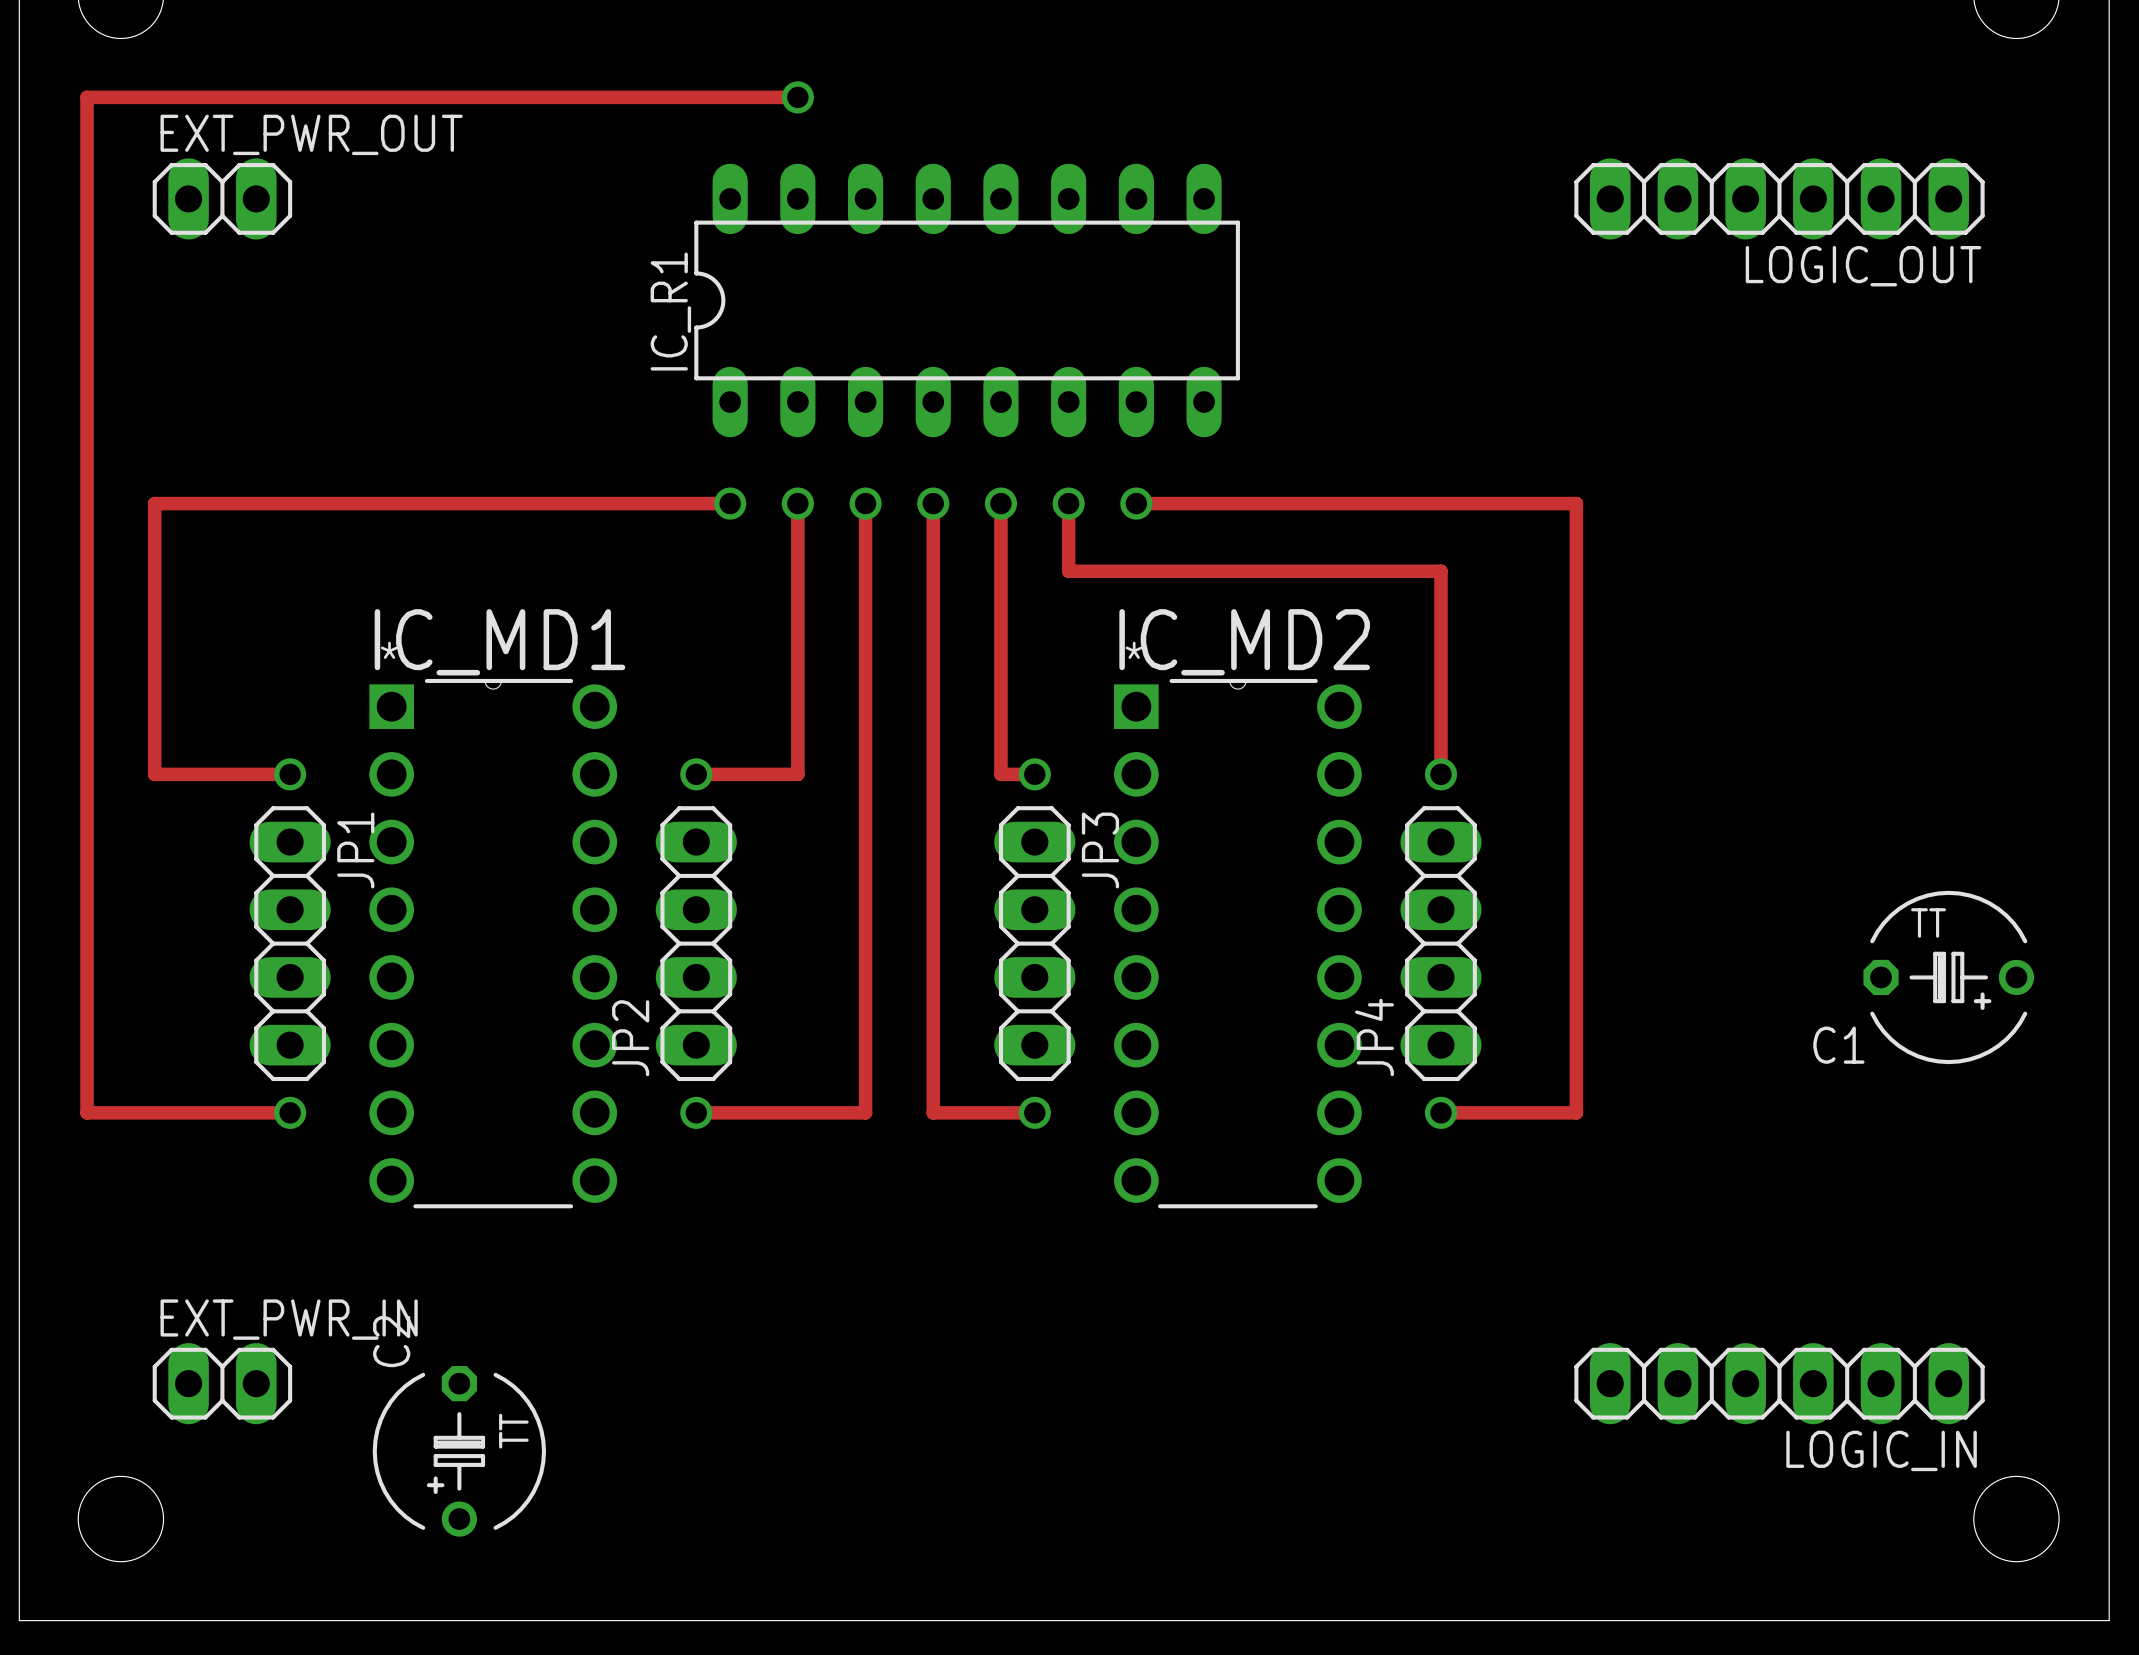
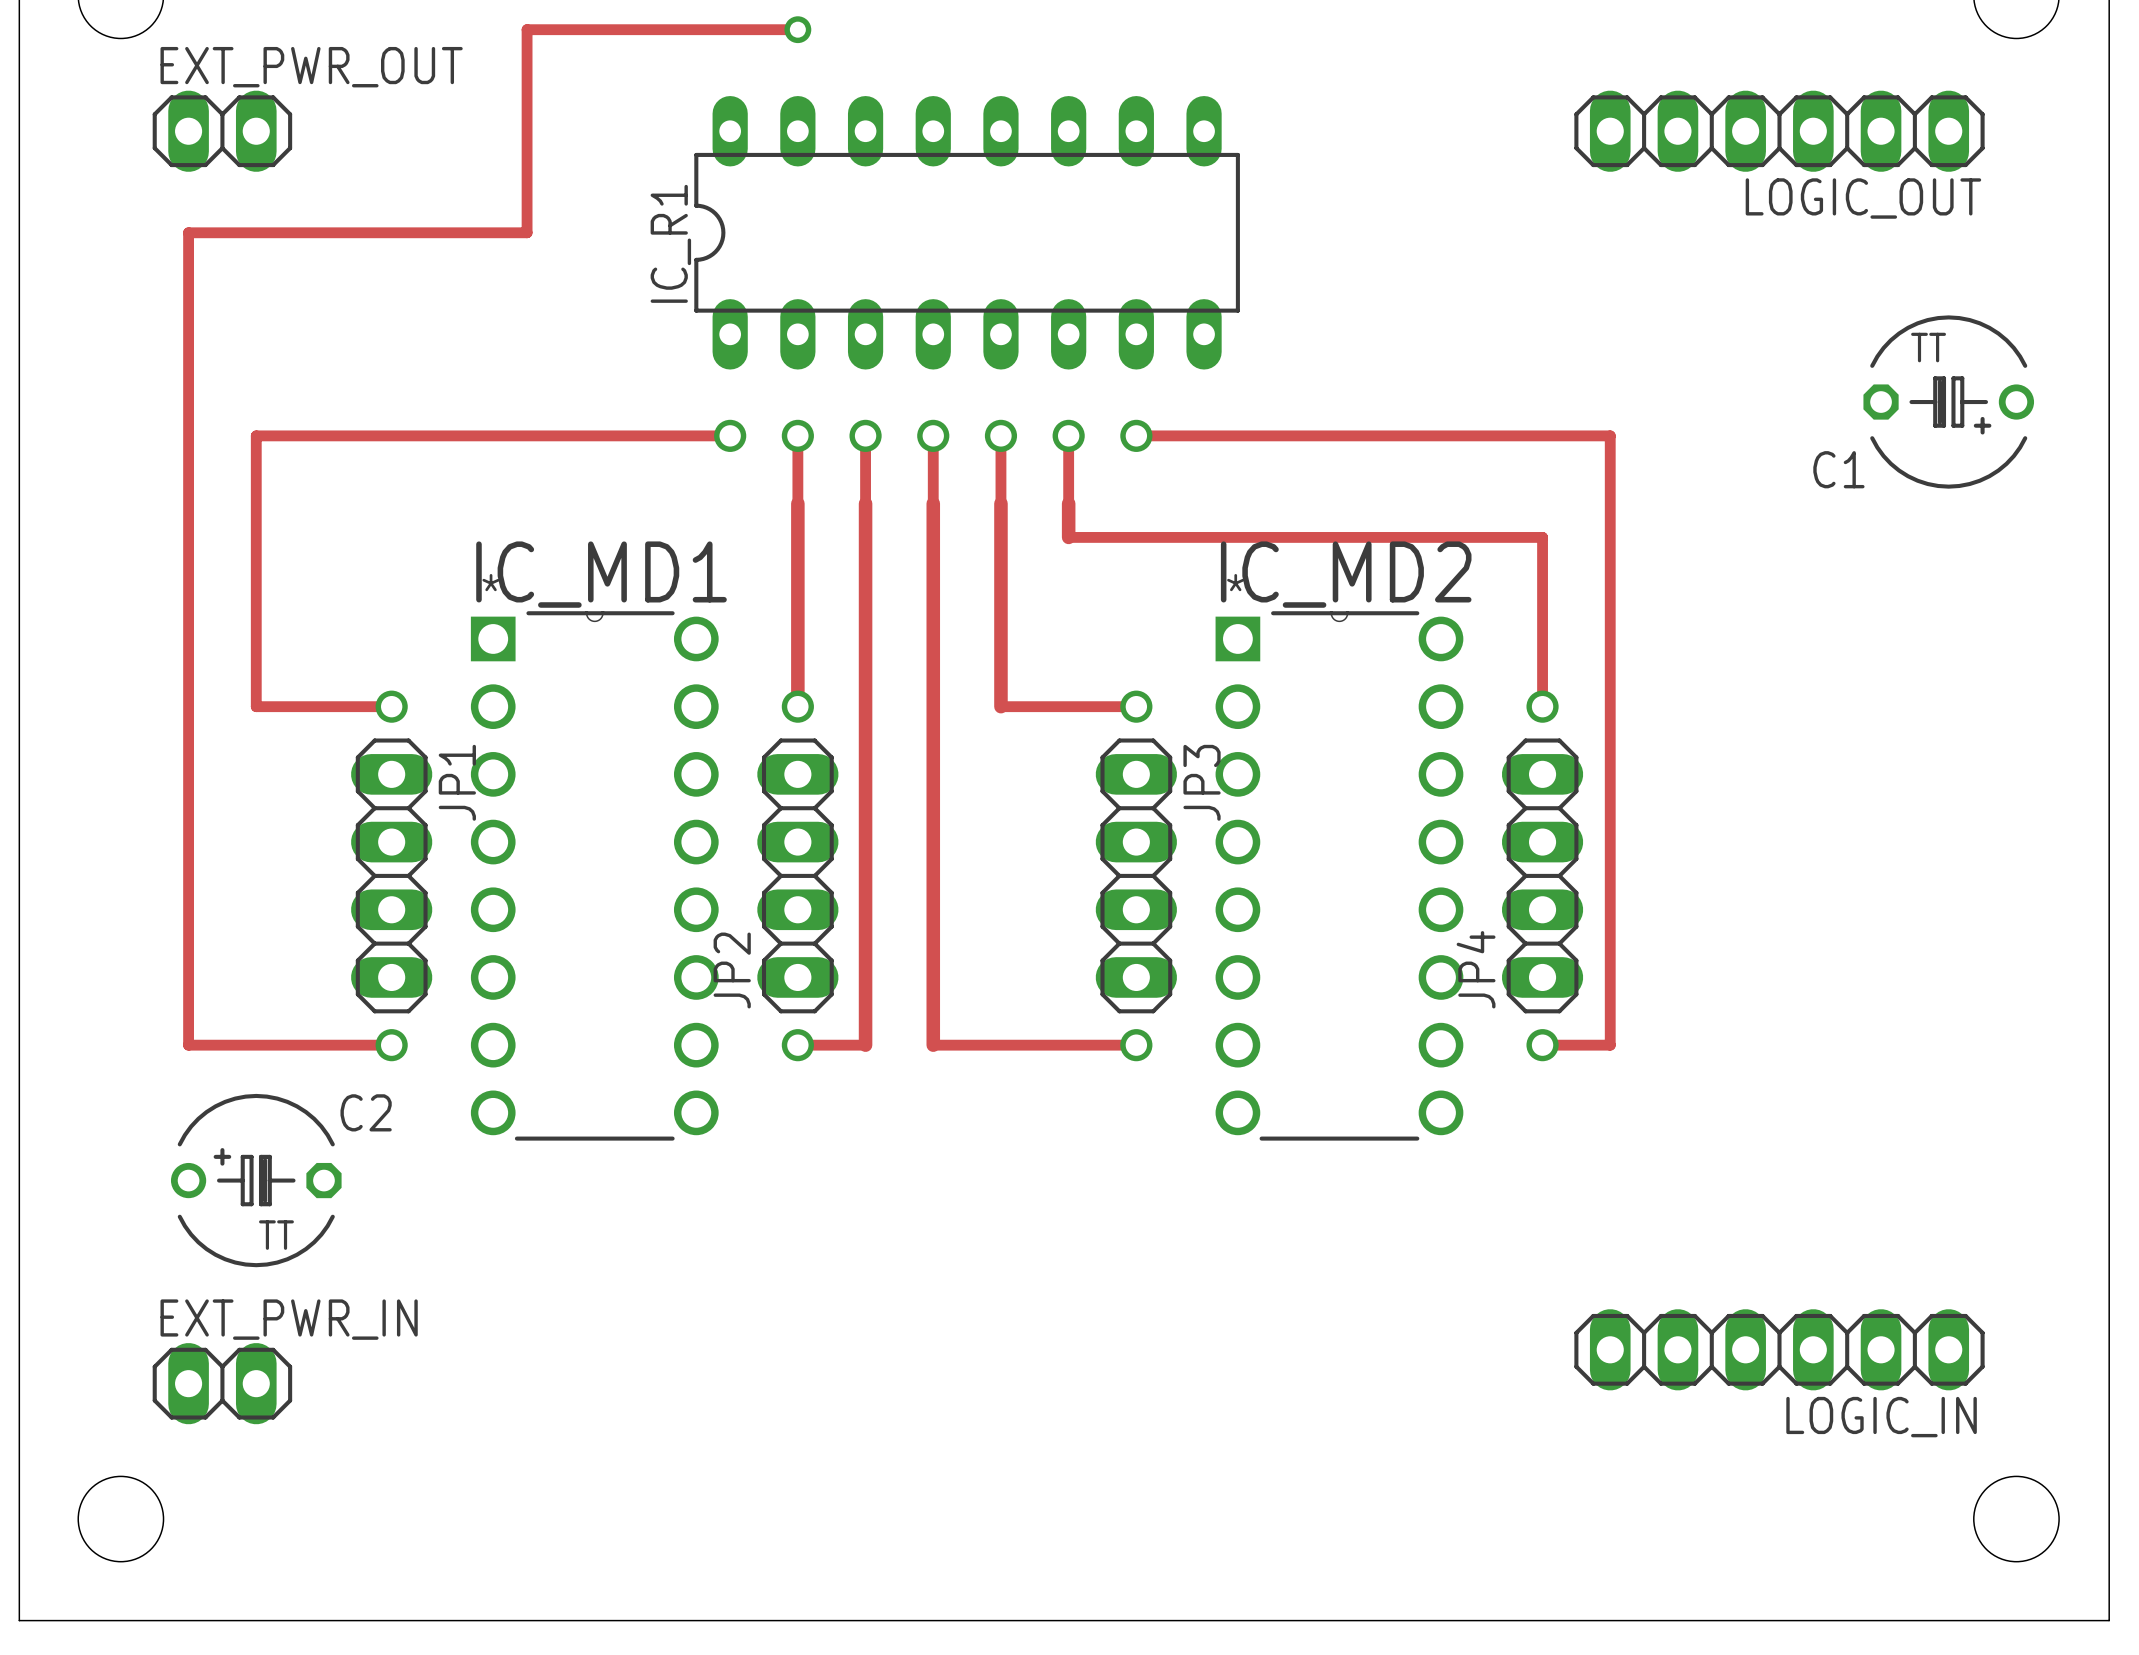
track: none -> (797, 29) (527, 29) (527, 232) (188, 232) (188, 1045) (391, 1045)
via: none -> (797, 29)
track: (797, 97) (87, 97) (87, 1112) (290, 1112) -> none
via: (797, 97) -> none
EXT_PWR_OUT position: (222, 198) -> (222, 131)
LOGIC_OUT position: (1779, 198) -> (1779, 131)
IC_R1 position: (967, 300) -> (967, 232)
track: none -> (730, 435) (256, 435) (256, 706) (391, 706)
via: none -> (730, 435)
track: none -> (797, 435) (797, 503)
via: none -> (797, 435)
track: none -> (865, 435) (865, 503)
via: none -> (865, 435)
track: none -> (933, 435) (933, 503)
via: none -> (933, 435)
track: none -> (1000, 435) (1000, 503)
via: none -> (1000, 435)
track: none -> (1068, 435) (1068, 503)
via: none -> (1068, 435)
track: none -> (1136, 435) (1610, 435) (1610, 1045) (1542, 1045)
via: none -> (1136, 435)
track: (730, 503) (154, 503) (154, 774) (290, 774) -> none
via: (730, 503) -> none
via: (797, 503) -> none
via: (865, 503) -> none
via: (933, 503) -> none
via: (1000, 503) -> none
via: (1068, 503) -> none
track: (1136, 503) (1576, 503) (1576, 1112) (1441, 1112) -> none
via: (1136, 503) -> none
track: (1068, 537) (1068, 571) (1441, 571) (1441, 774) -> (1068, 537) (1542, 537) (1542, 706)
track: (797, 706) (797, 774) (696, 774) -> none
via: none -> (797, 706)
track: (1000, 706) (1000, 774) (1034, 774) -> (1000, 706) (1136, 706)
via: none -> (1136, 706)
via position: (290, 774) -> (391, 706)
via: (696, 774) -> none
via: (1034, 774) -> none
via position: (1441, 774) -> (1542, 706)
JP1 position: (290, 943) -> (391, 875)
IC_MD1 position: (493, 943) -> (594, 875)
JP2 position: (696, 943) -> (797, 875)
JP3 position: (1034, 943) -> (1136, 875)
IC_MD2 position: (1237, 943) -> (1339, 875)
JP4 position: (1441, 943) -> (1542, 875)
C1 position: (1948, 977) -> (1948, 402)
track: (865, 1045) (865, 1112) (696, 1112) -> (865, 1045) (797, 1045)
track: (933, 1045) (933, 1112) (1034, 1112) -> (933, 1045) (1136, 1045)
via position: (290, 1112) -> (391, 1045)
via position: (696, 1112) -> (797, 1045)
via position: (1034, 1112) -> (1136, 1045)
via position: (1441, 1112) -> (1542, 1045)
LOGIC_IN position: (1779, 1383) -> (1779, 1349)
C2 rotation: 0° (459, 1451) -> 90° clockwise (256, 1180)
C2 position: (459, 1451) -> (256, 1180)

